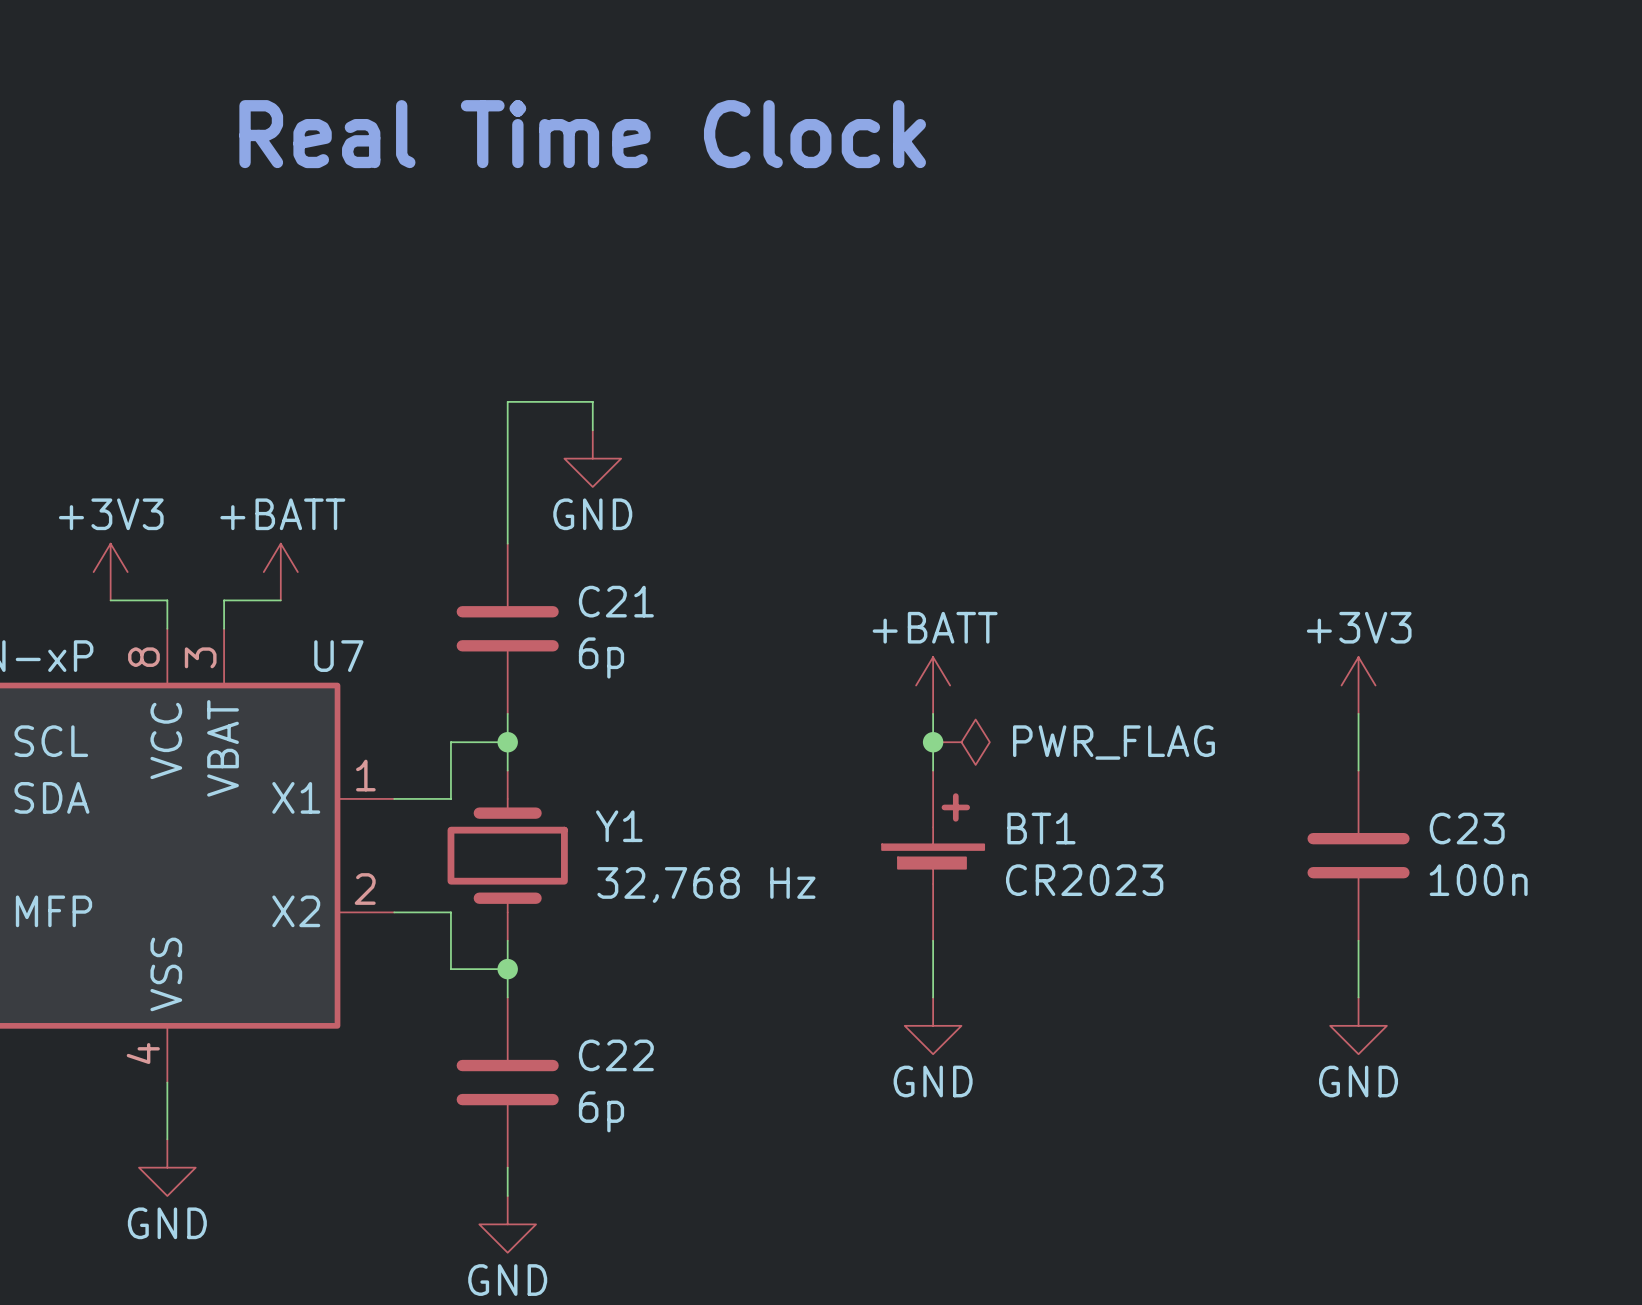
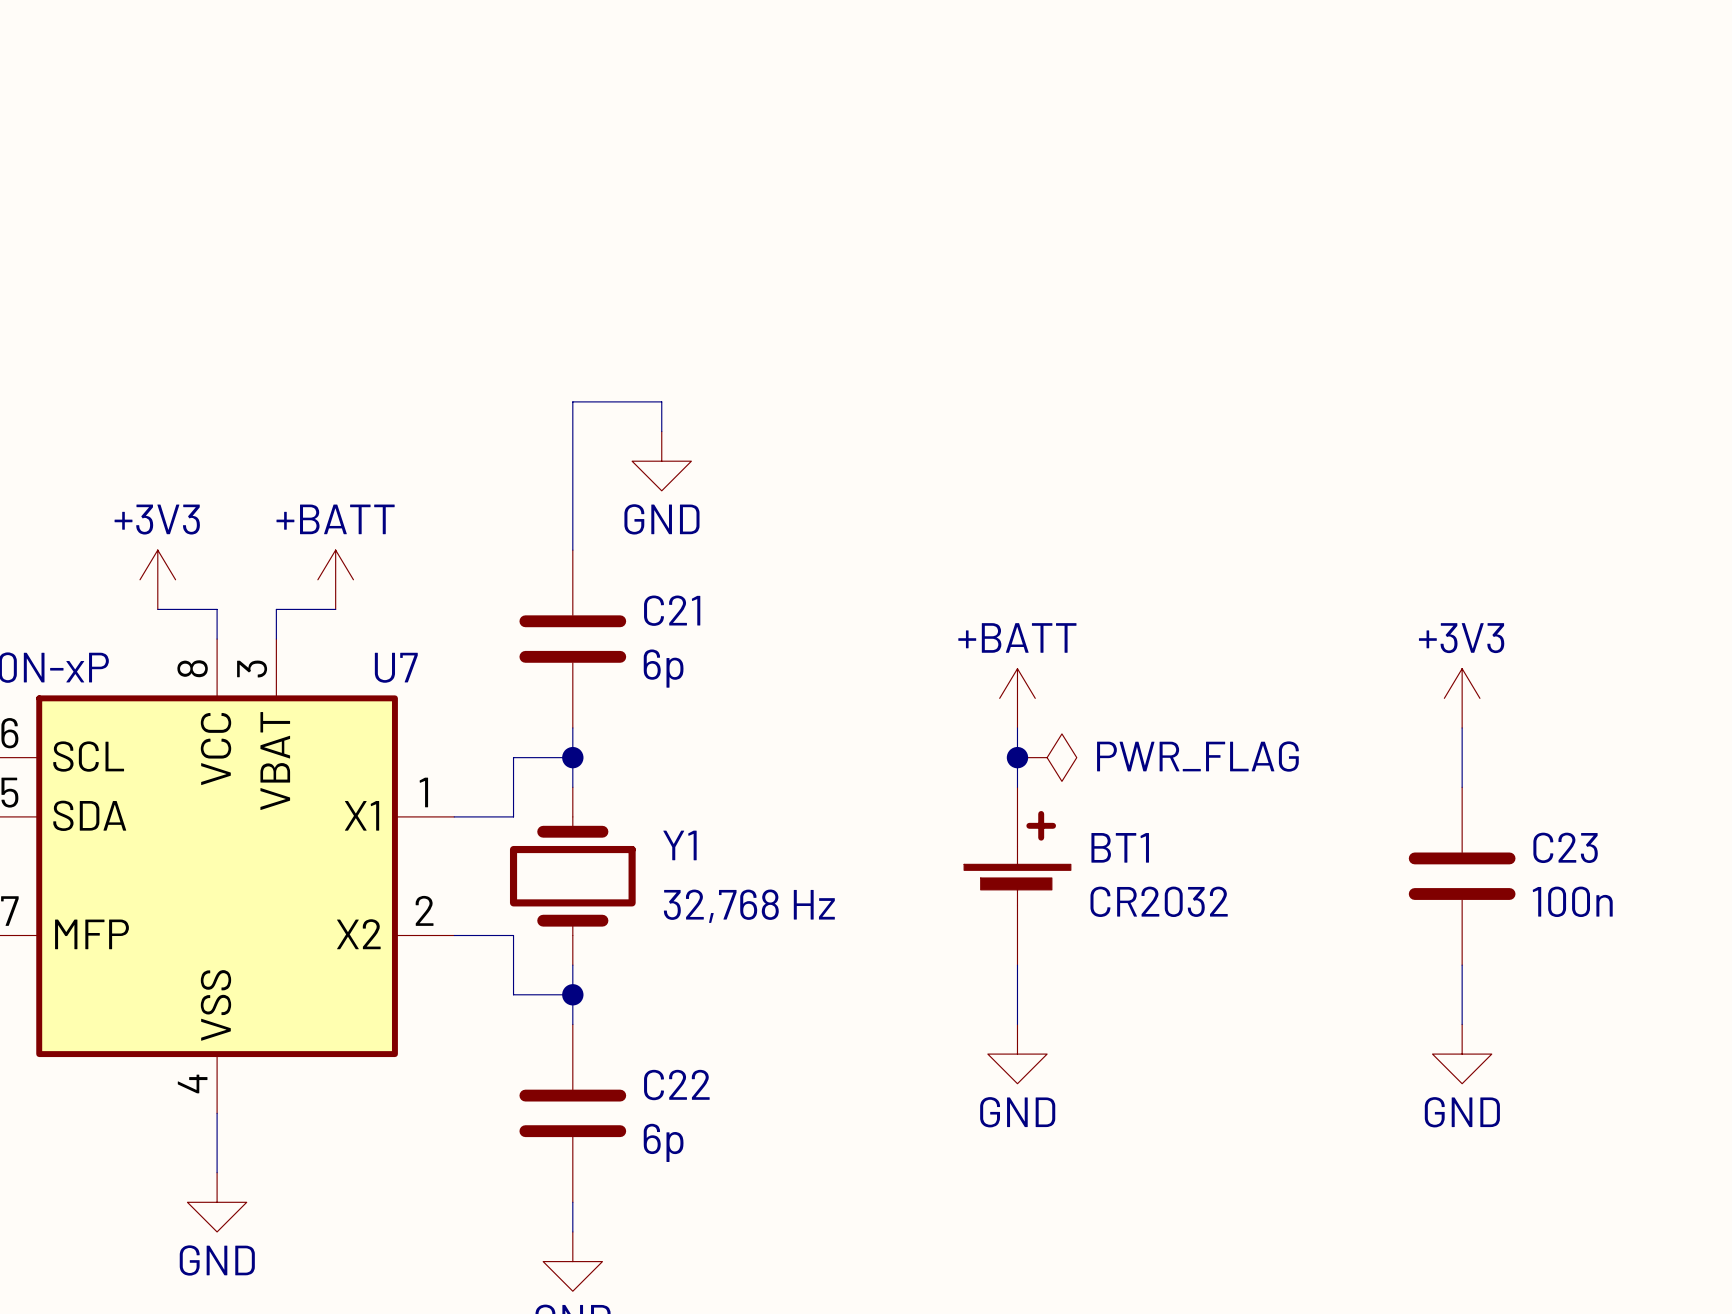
text: Real Time Clock (582, 134) -> none
BT1 value: CR2023 (1084, 880) -> CR2032 (1159, 901)

